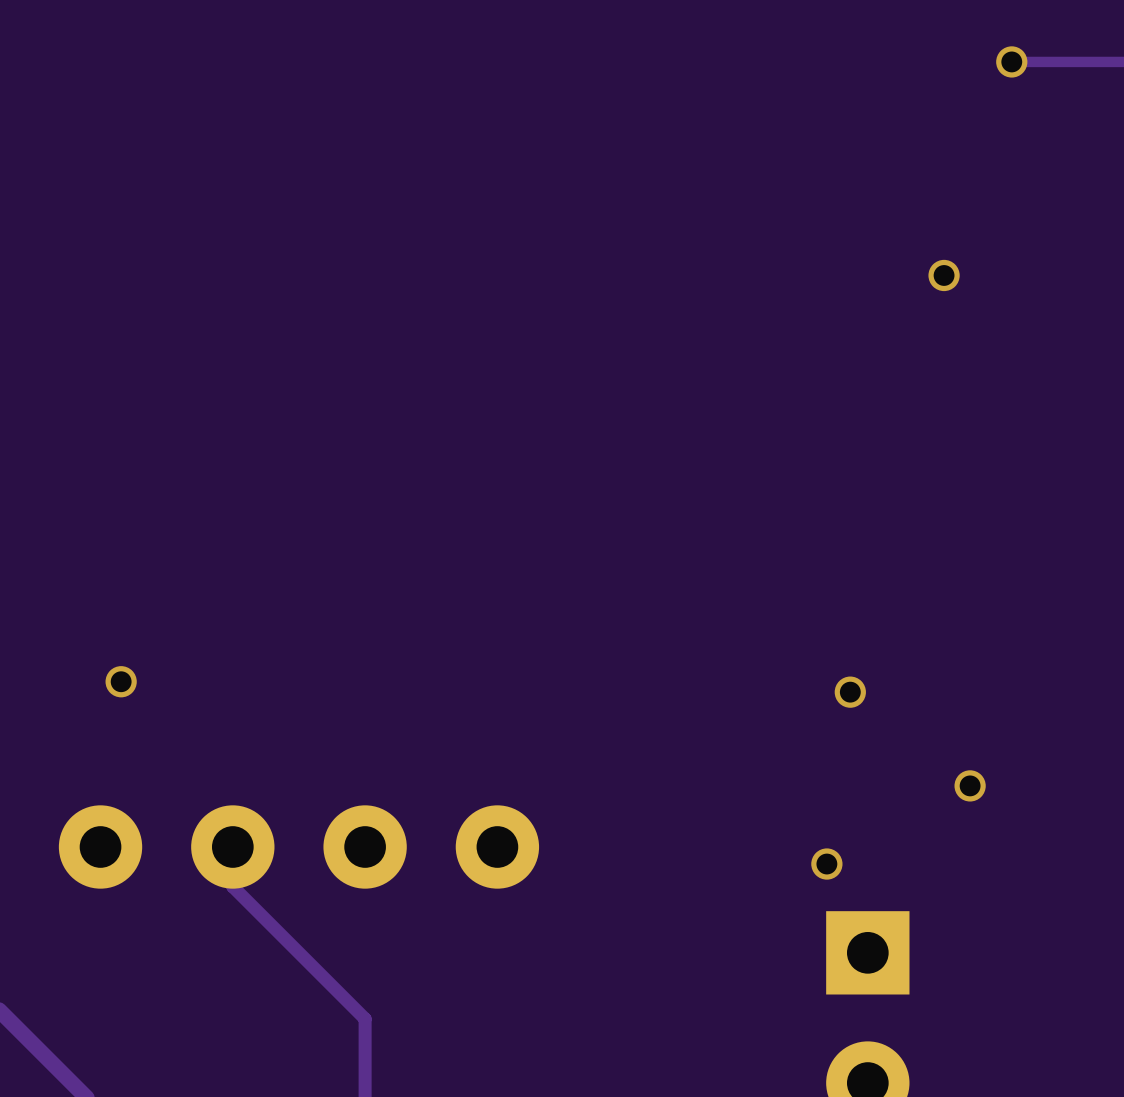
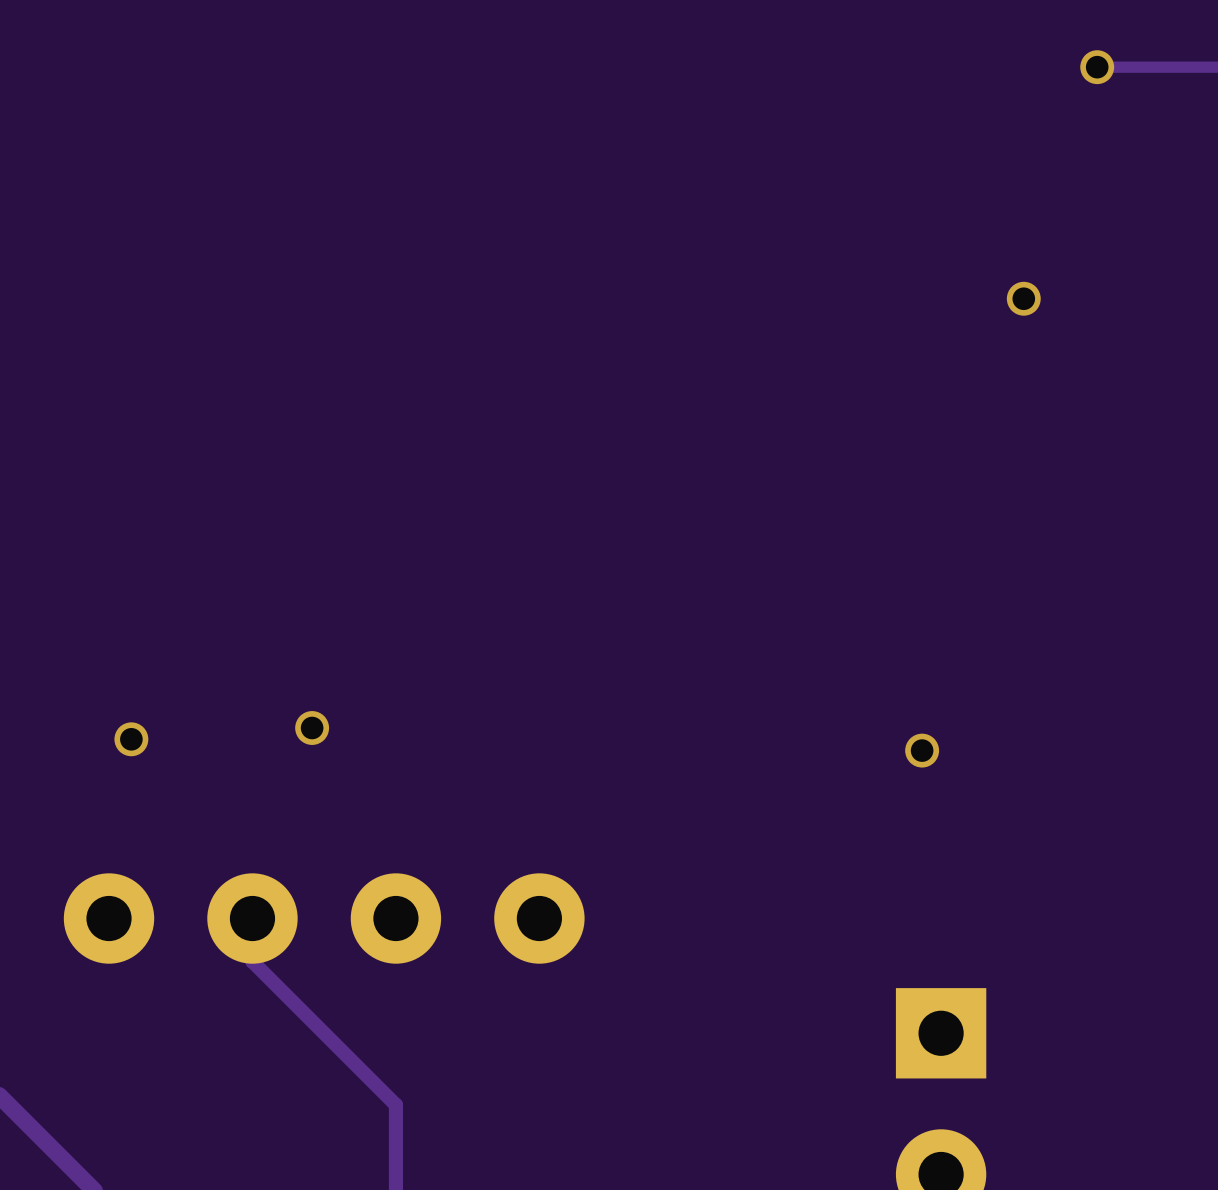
via: none -> (312, 728)
via: (970, 785) -> none
via: (826, 864) -> none

